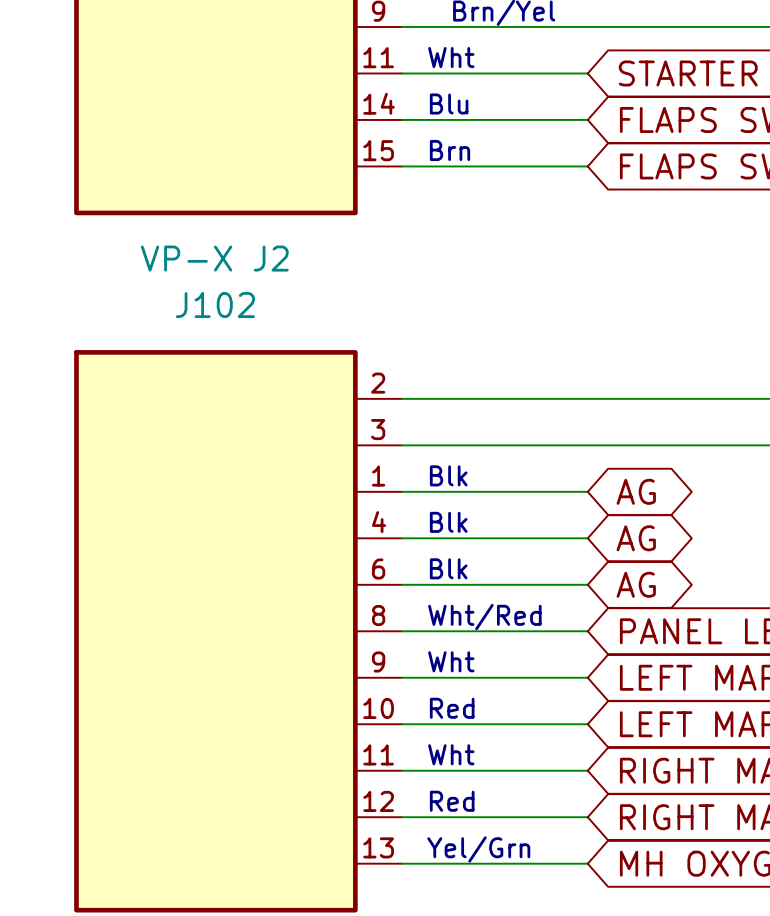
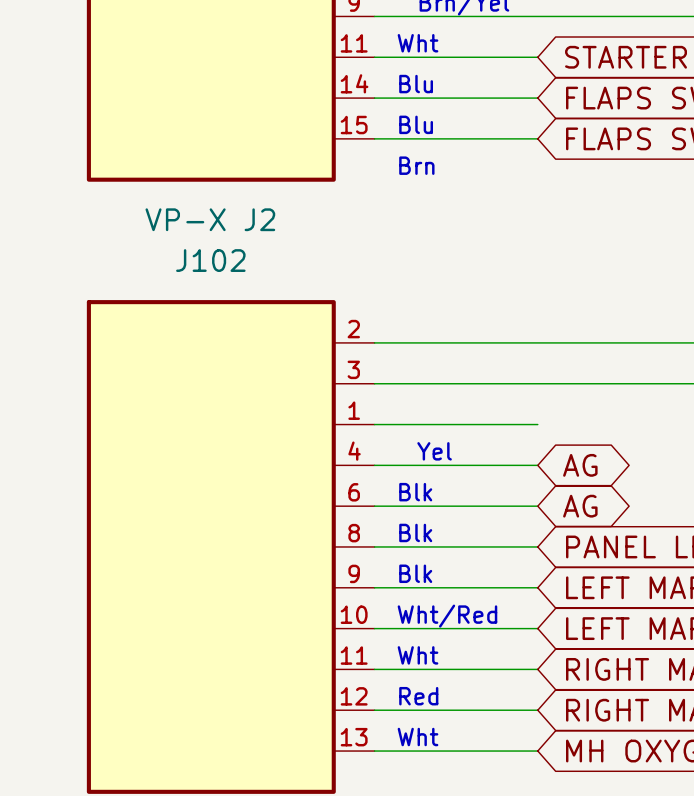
text: Brn (450, 150) -> Blu (416, 124)
text: none -> Brn (416, 165)
text: Blk (448, 475) -> none
global label: AG (636, 491) -> none
text: Blk (448, 522) -> none
text: none -> Yel (434, 451)
text: Wht/Red (484, 617) -> Blk (415, 532)
text: Wht (451, 661) -> Blk (415, 573)
text: Red (452, 708) -> Wht/Red (447, 616)
text: Yel/Grn (478, 849) -> Wht (418, 737)

